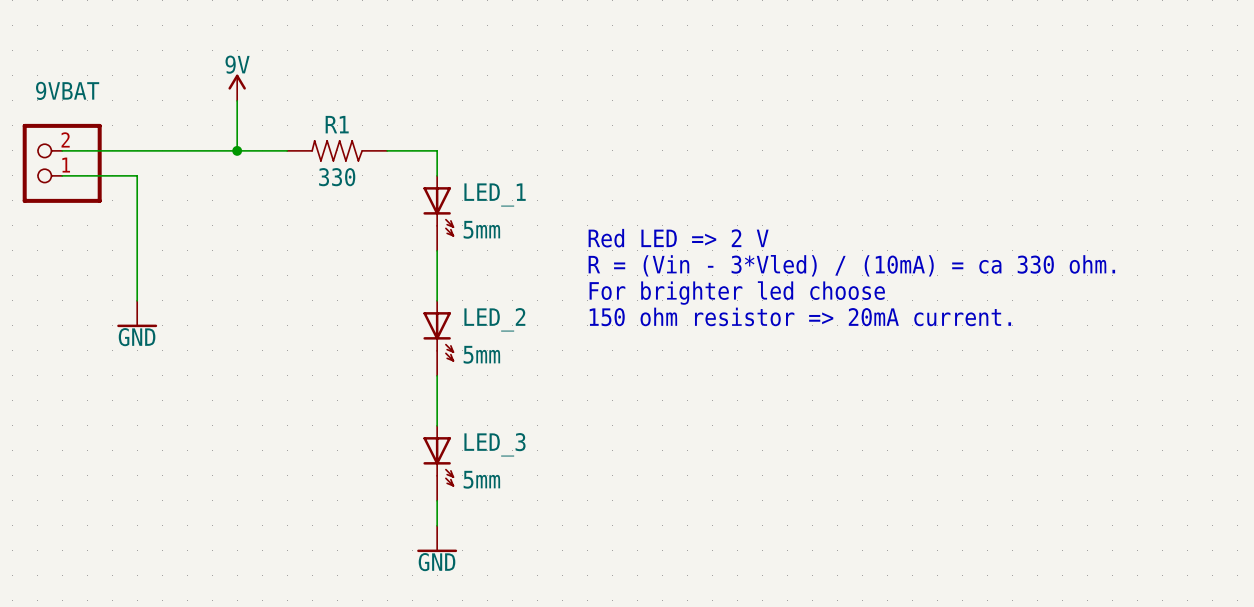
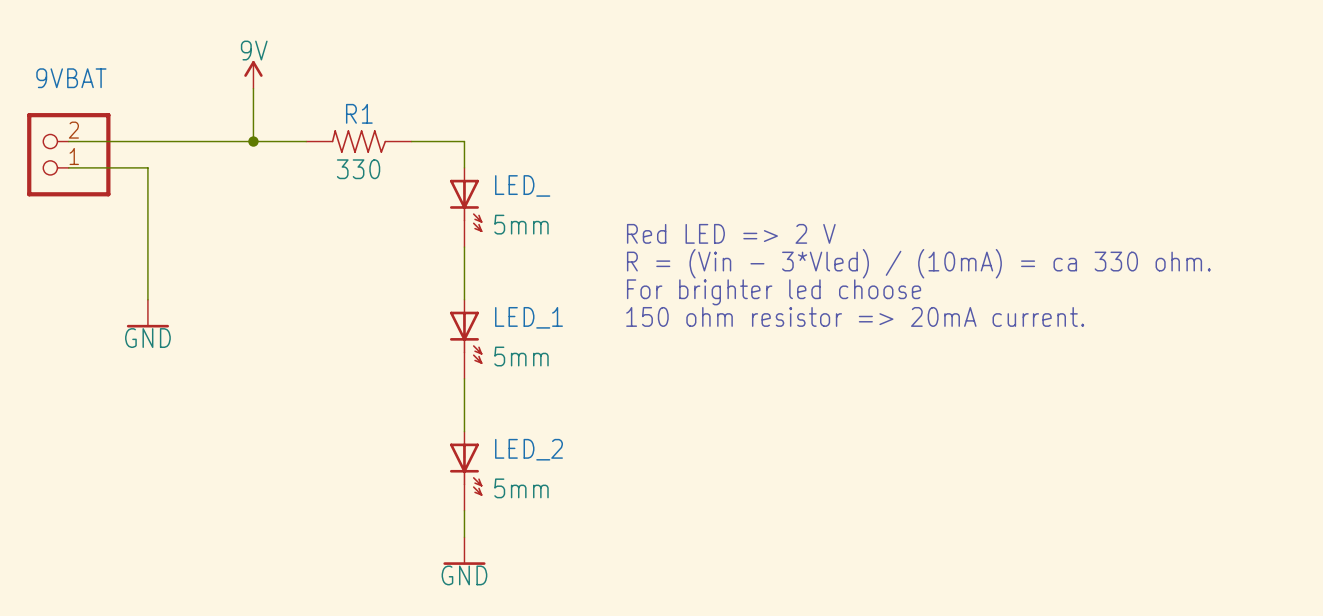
LED_1 name: LED_1 (495, 194) -> LED_ (522, 185)
LED_2 name: LED_2 (494, 319) -> LED_1 (529, 317)
LED_3 name: LED_3 (494, 444) -> LED_2 (529, 449)

